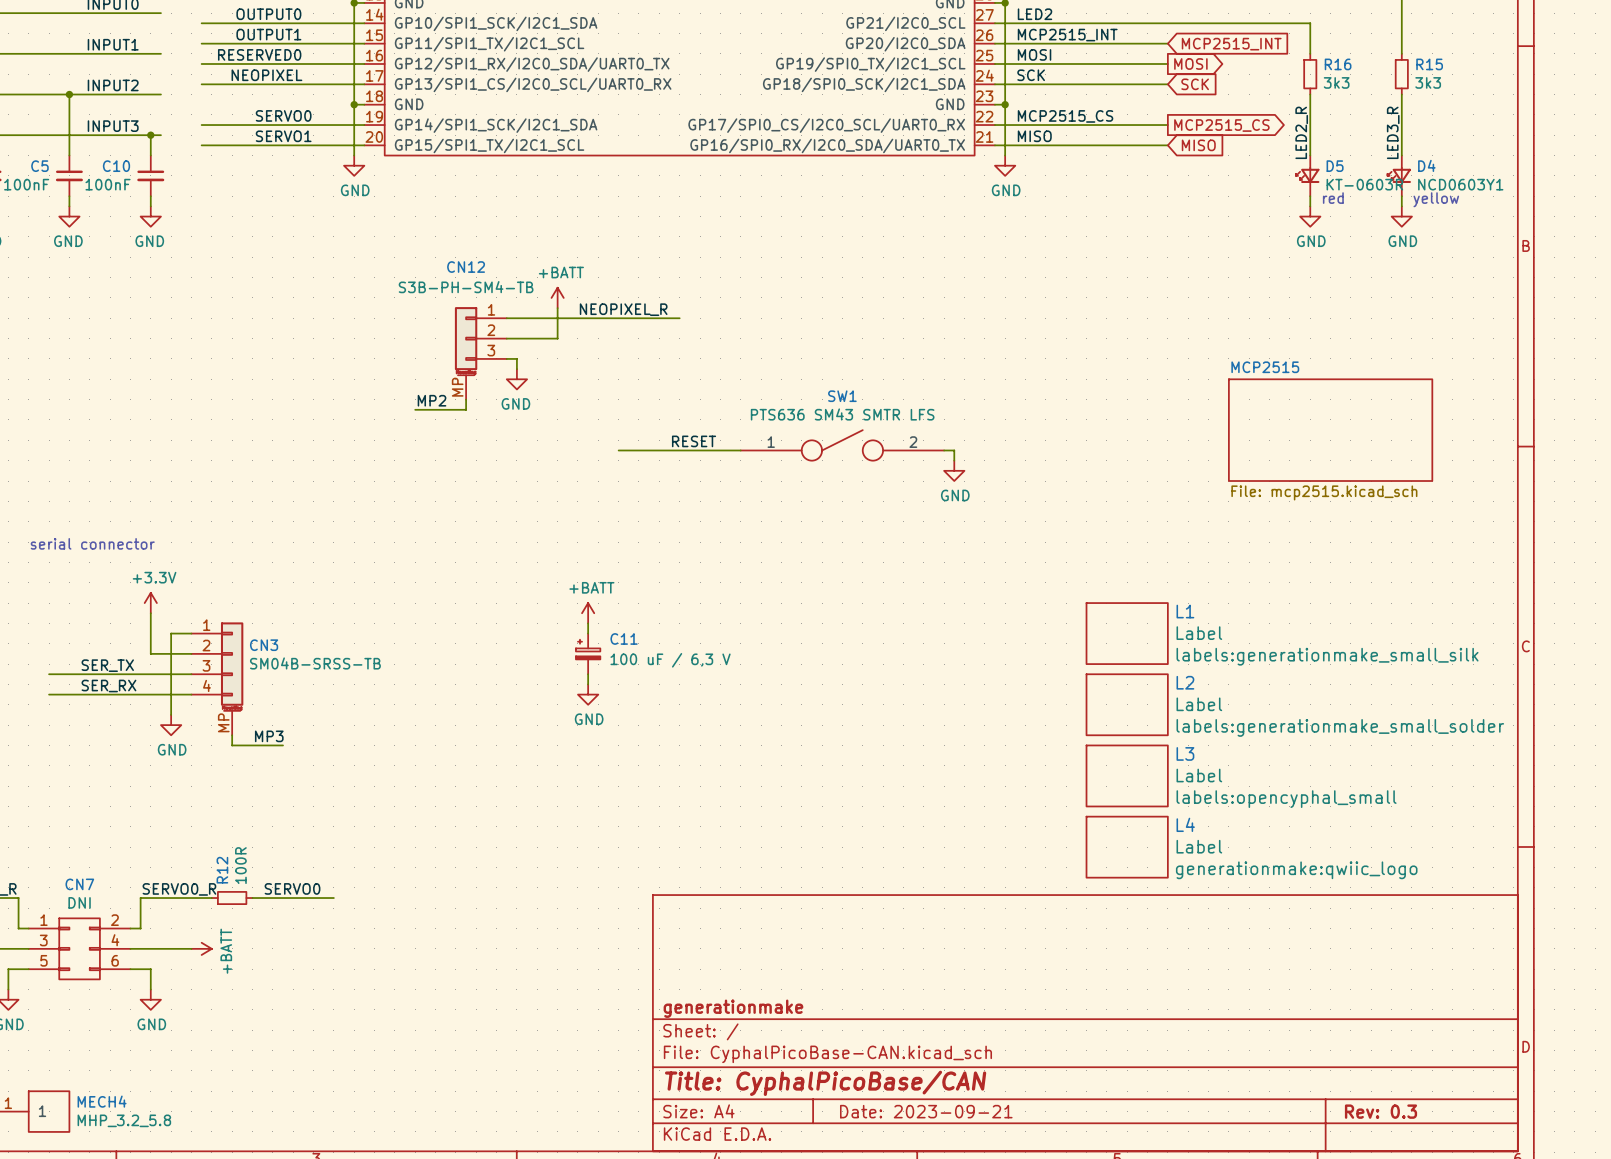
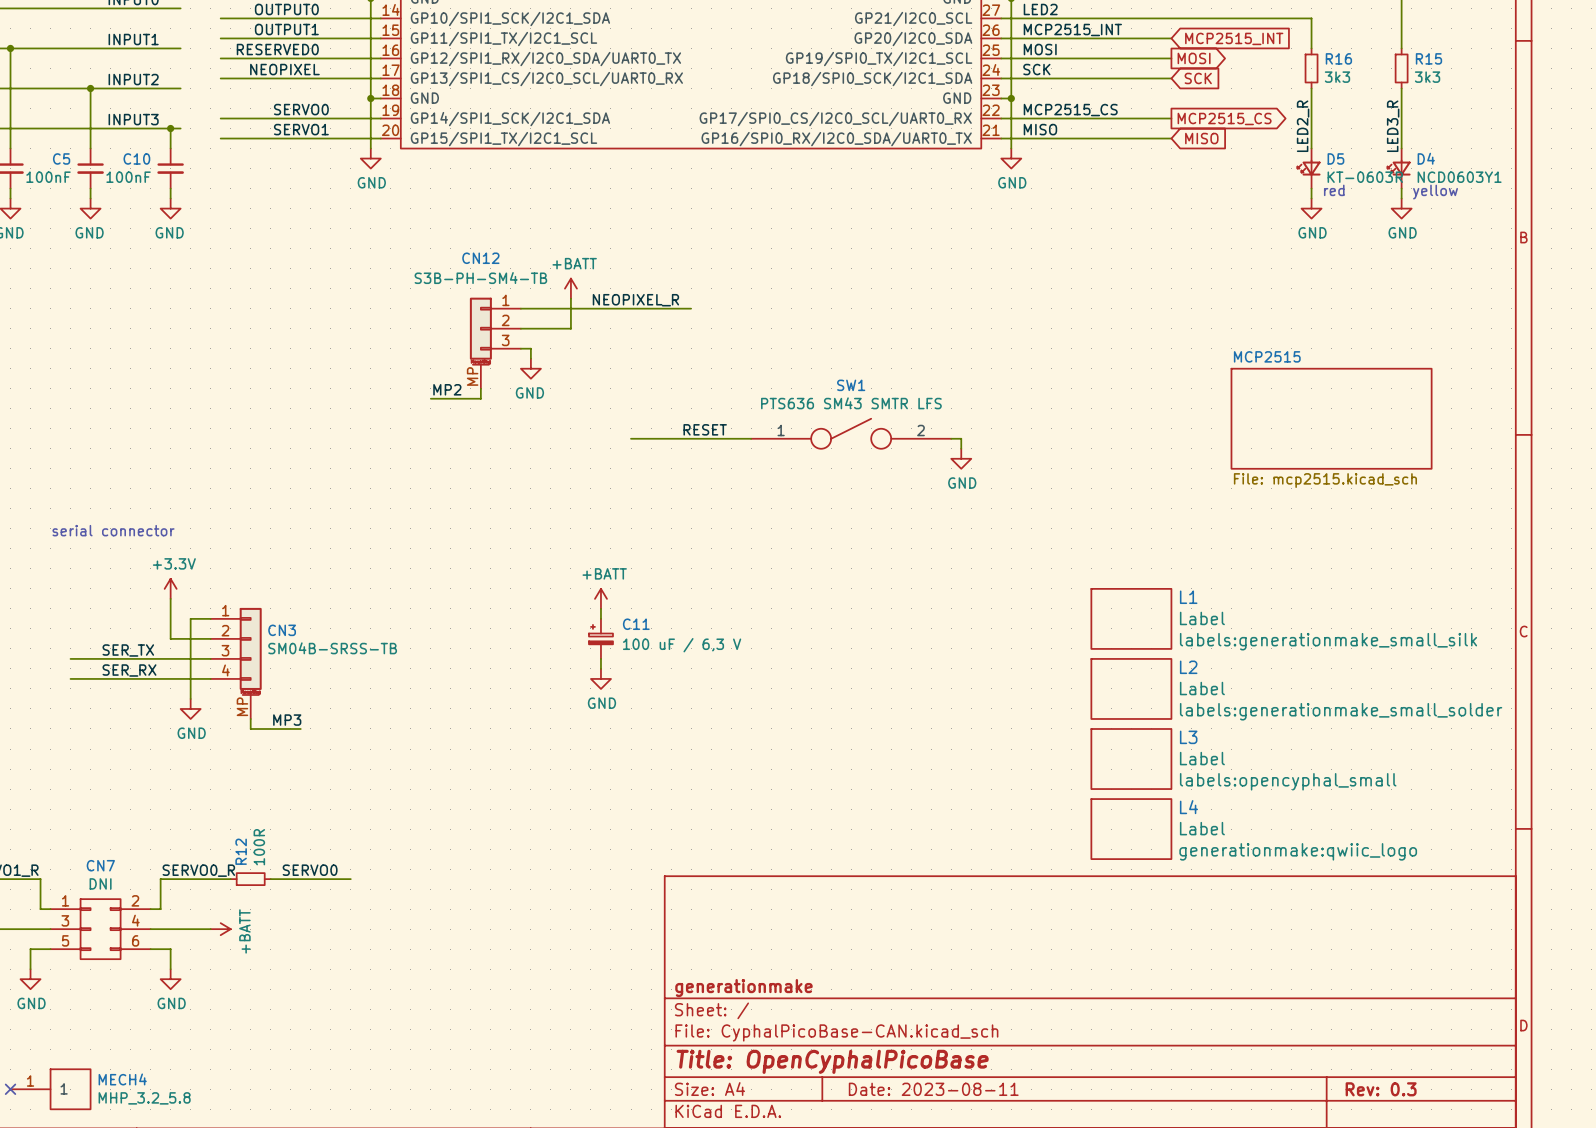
title block: Title: CyphalPicoBase/CAN (825, 1083) -> Title: OpenCyphalPicoBase (832, 1061)
title block: Date: 2023-09-21 (926, 1111) -> Date: 2023-08-11 (933, 1089)

